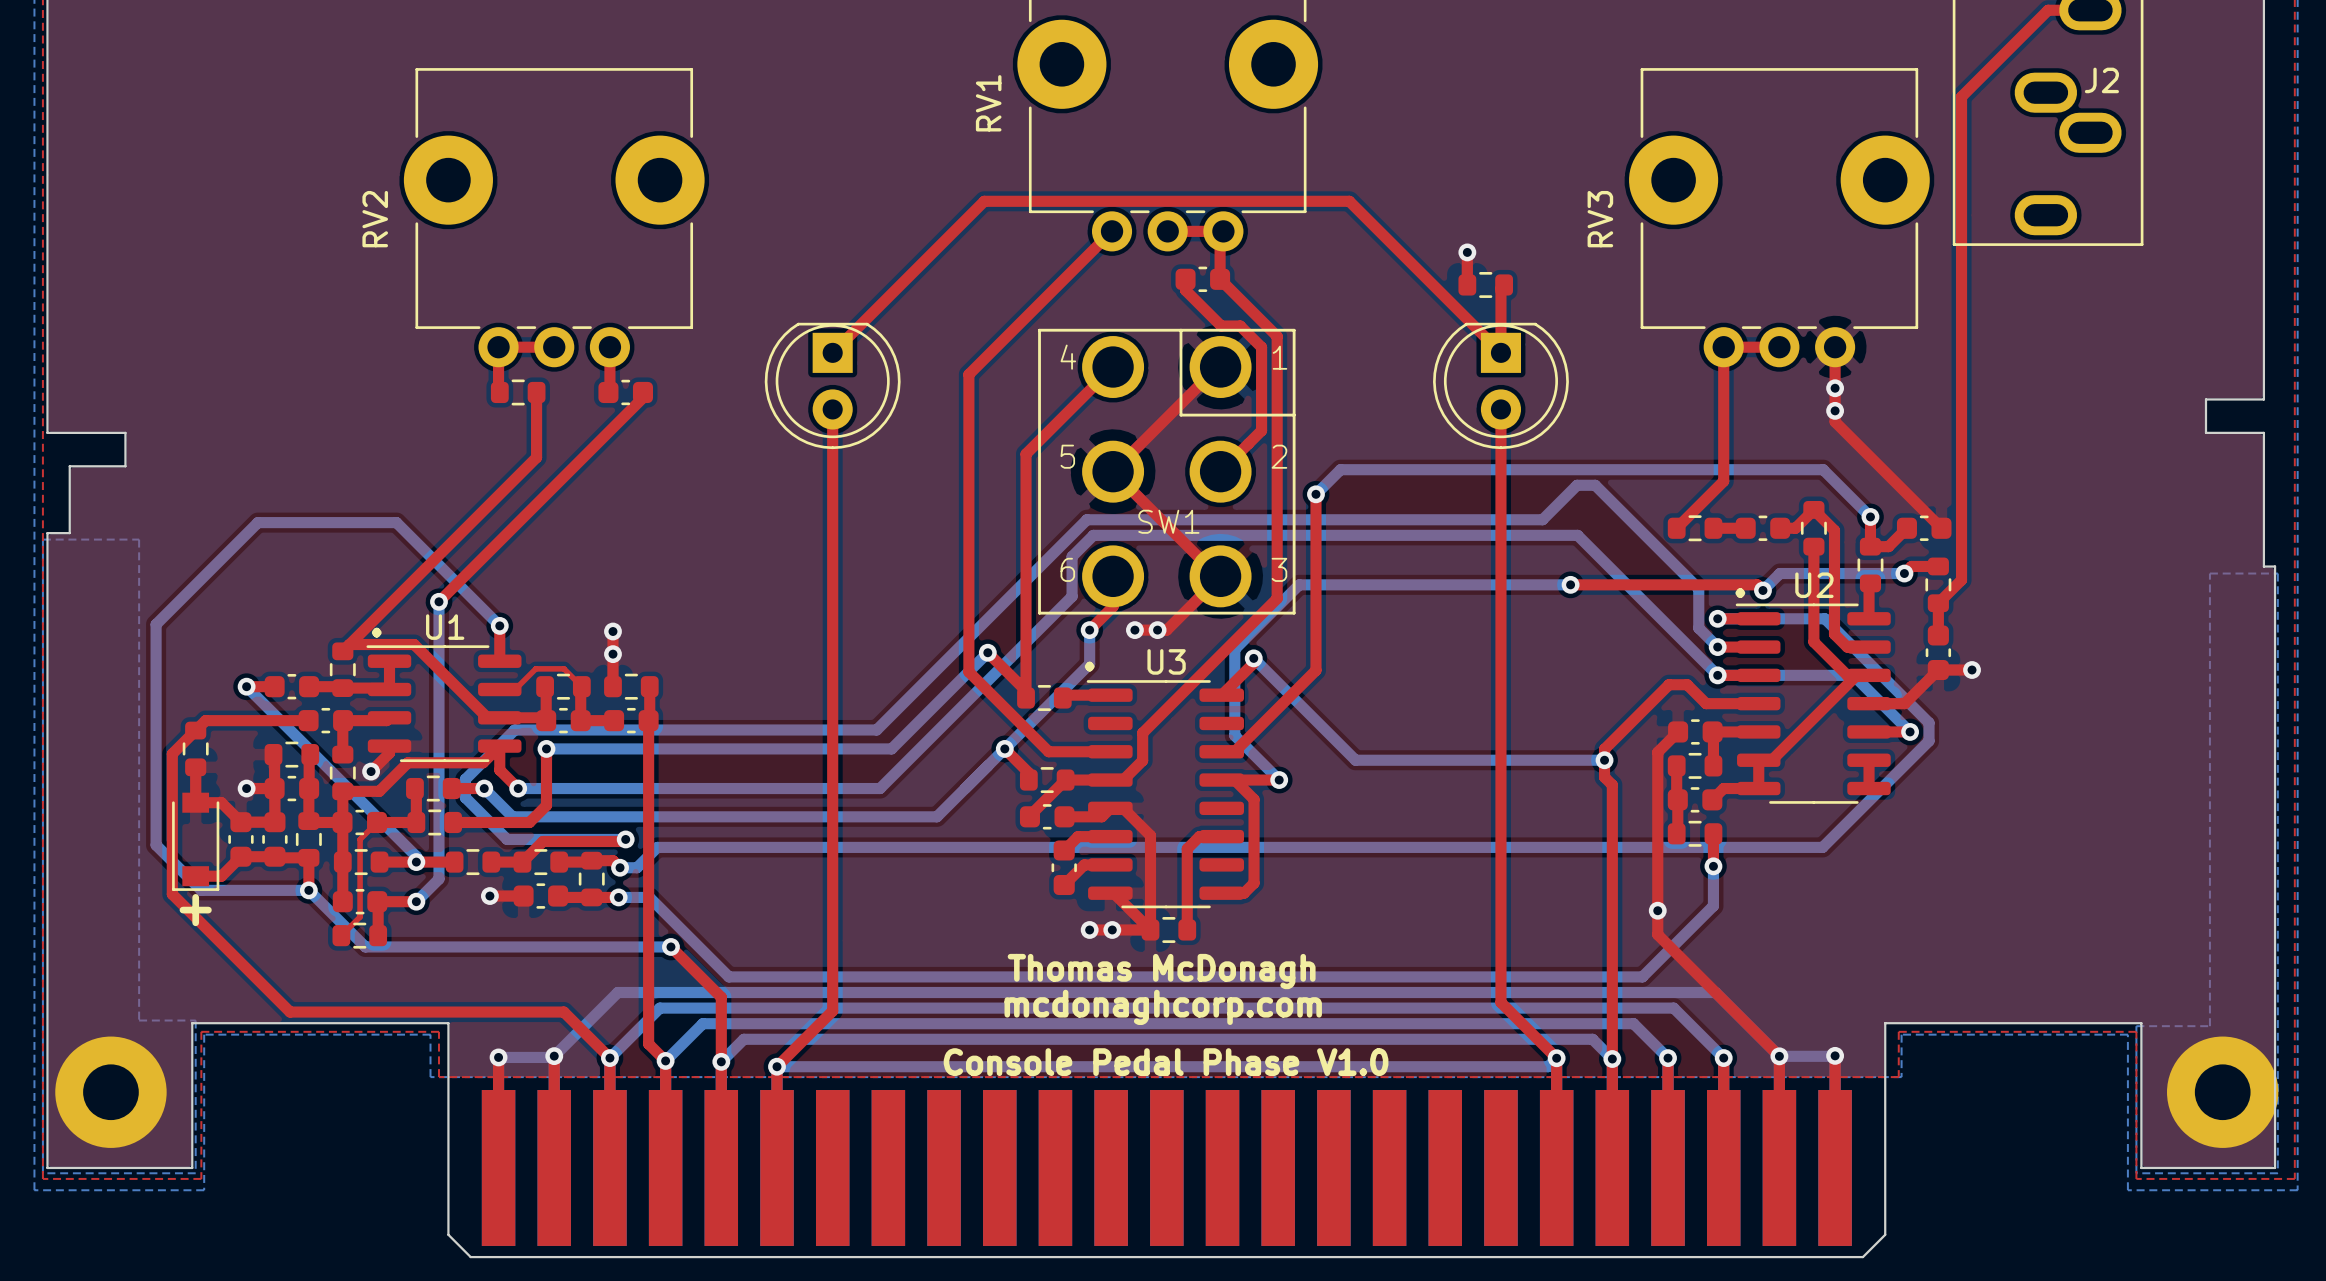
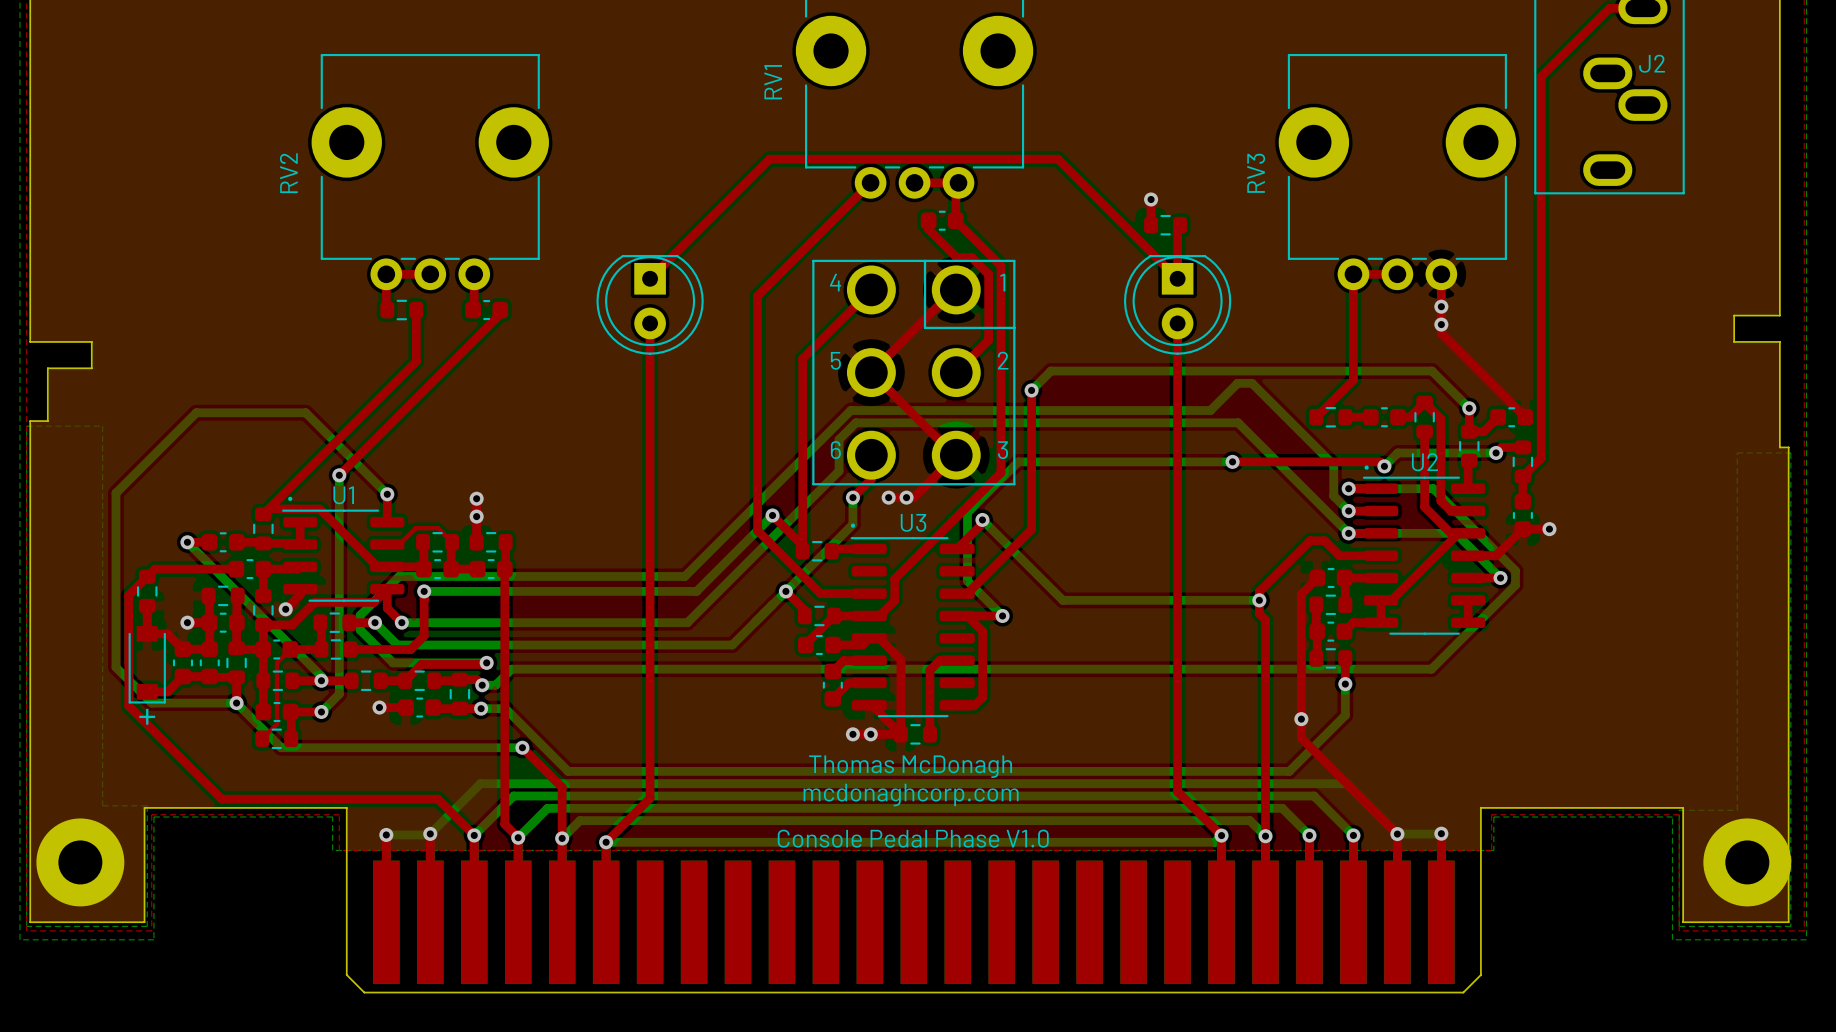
SW1 name: SW1 (1168, 521) -> none

